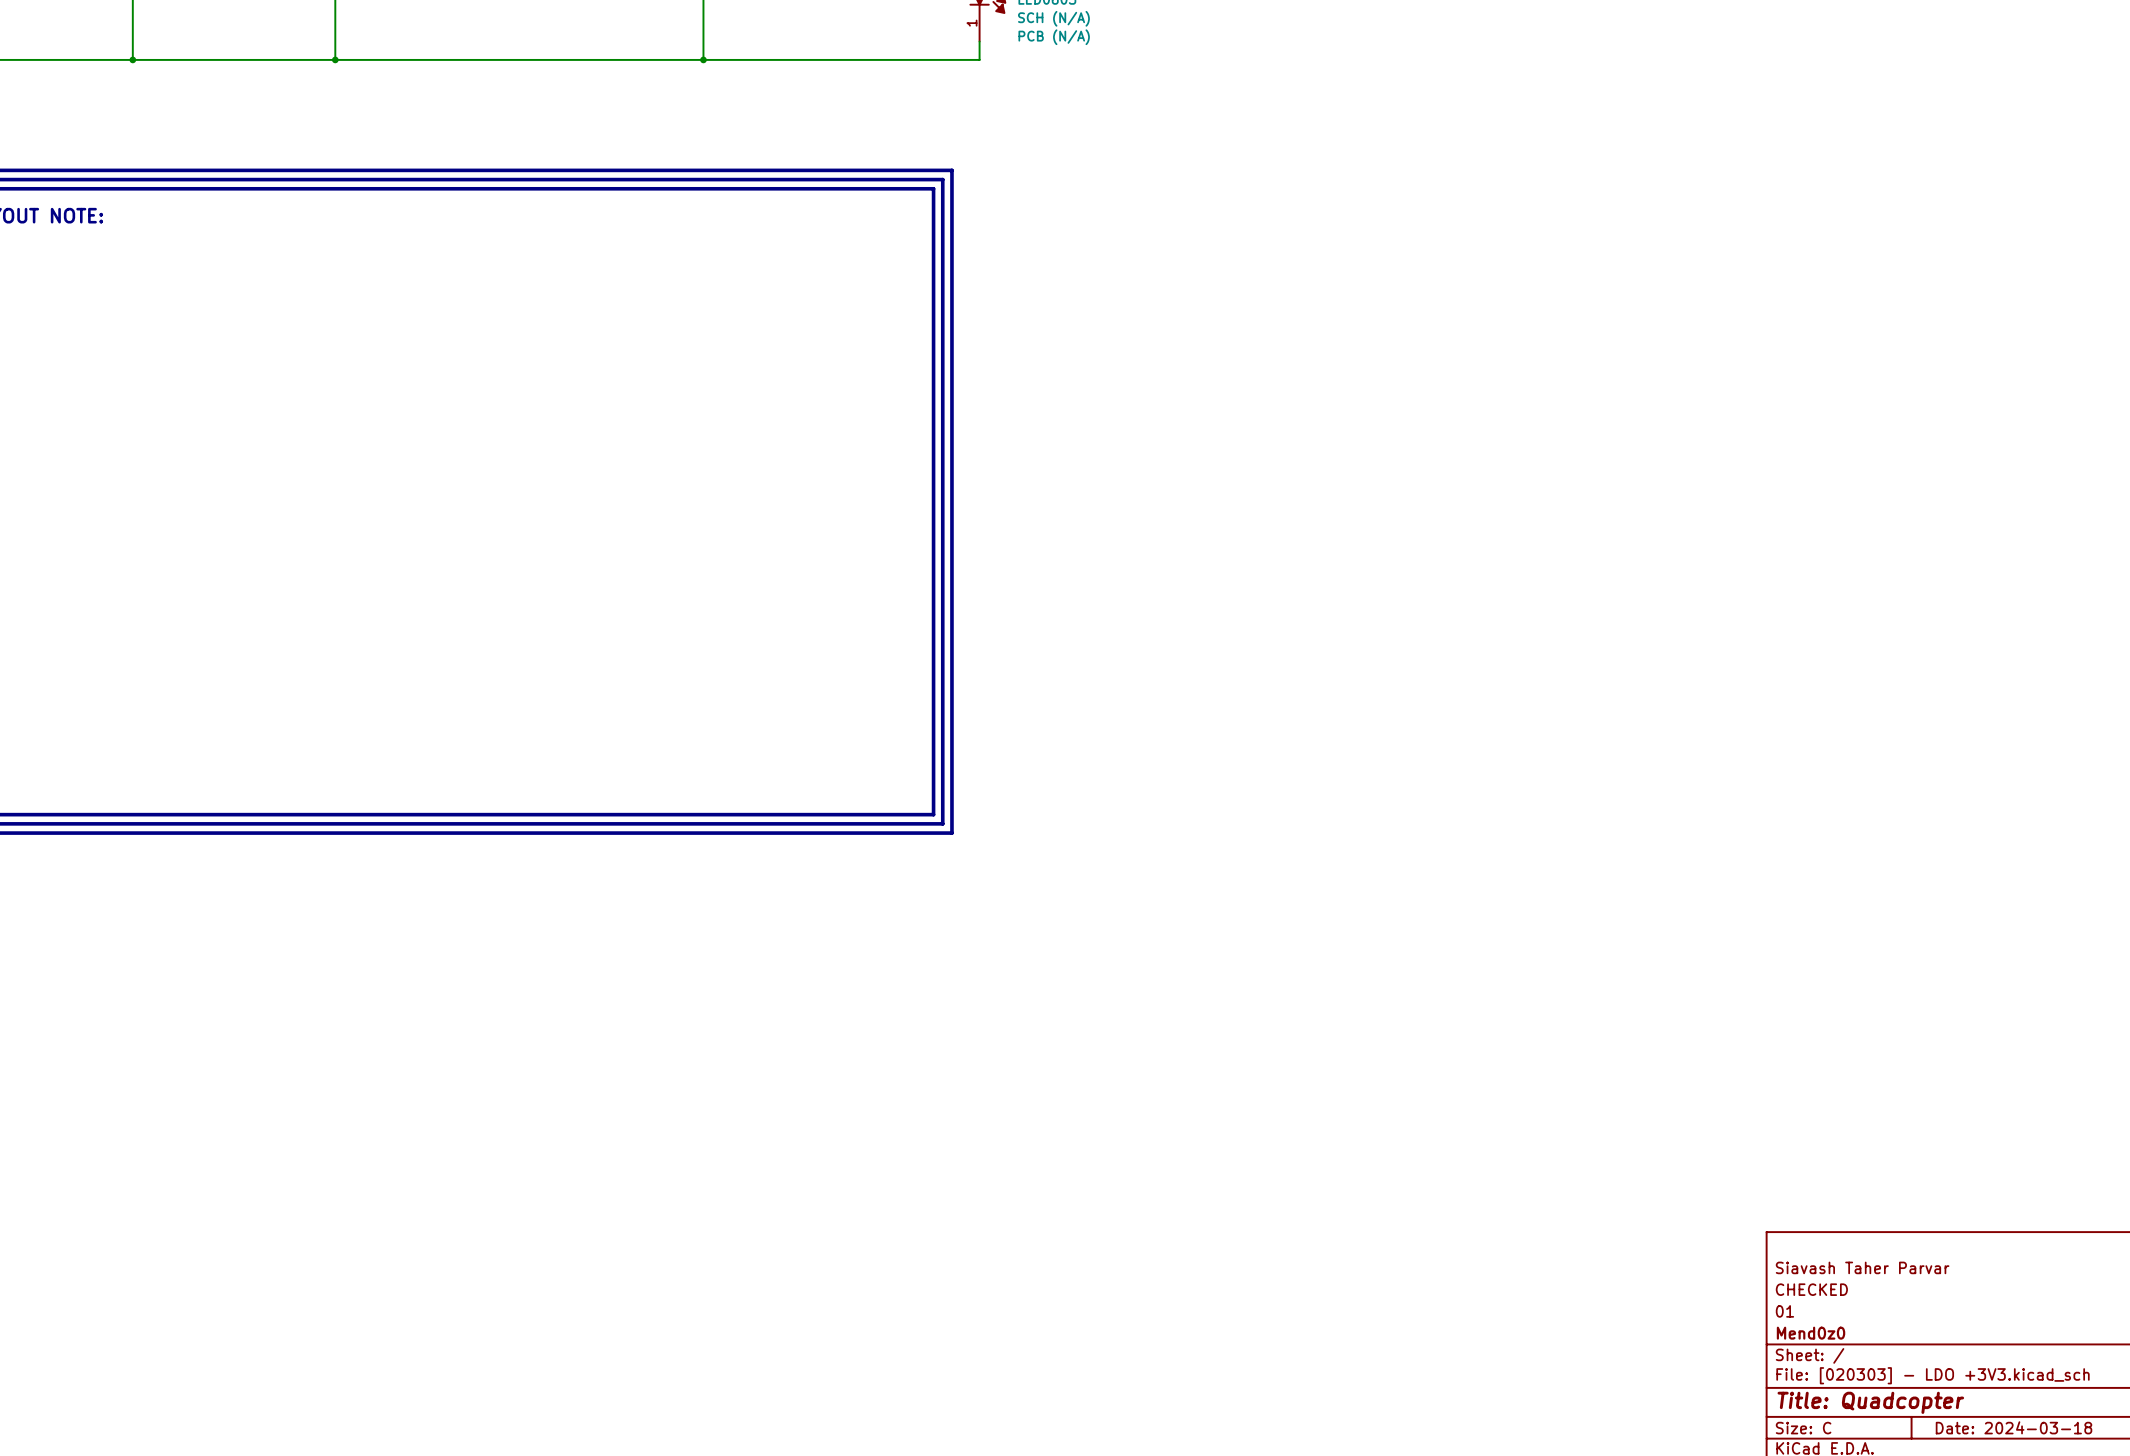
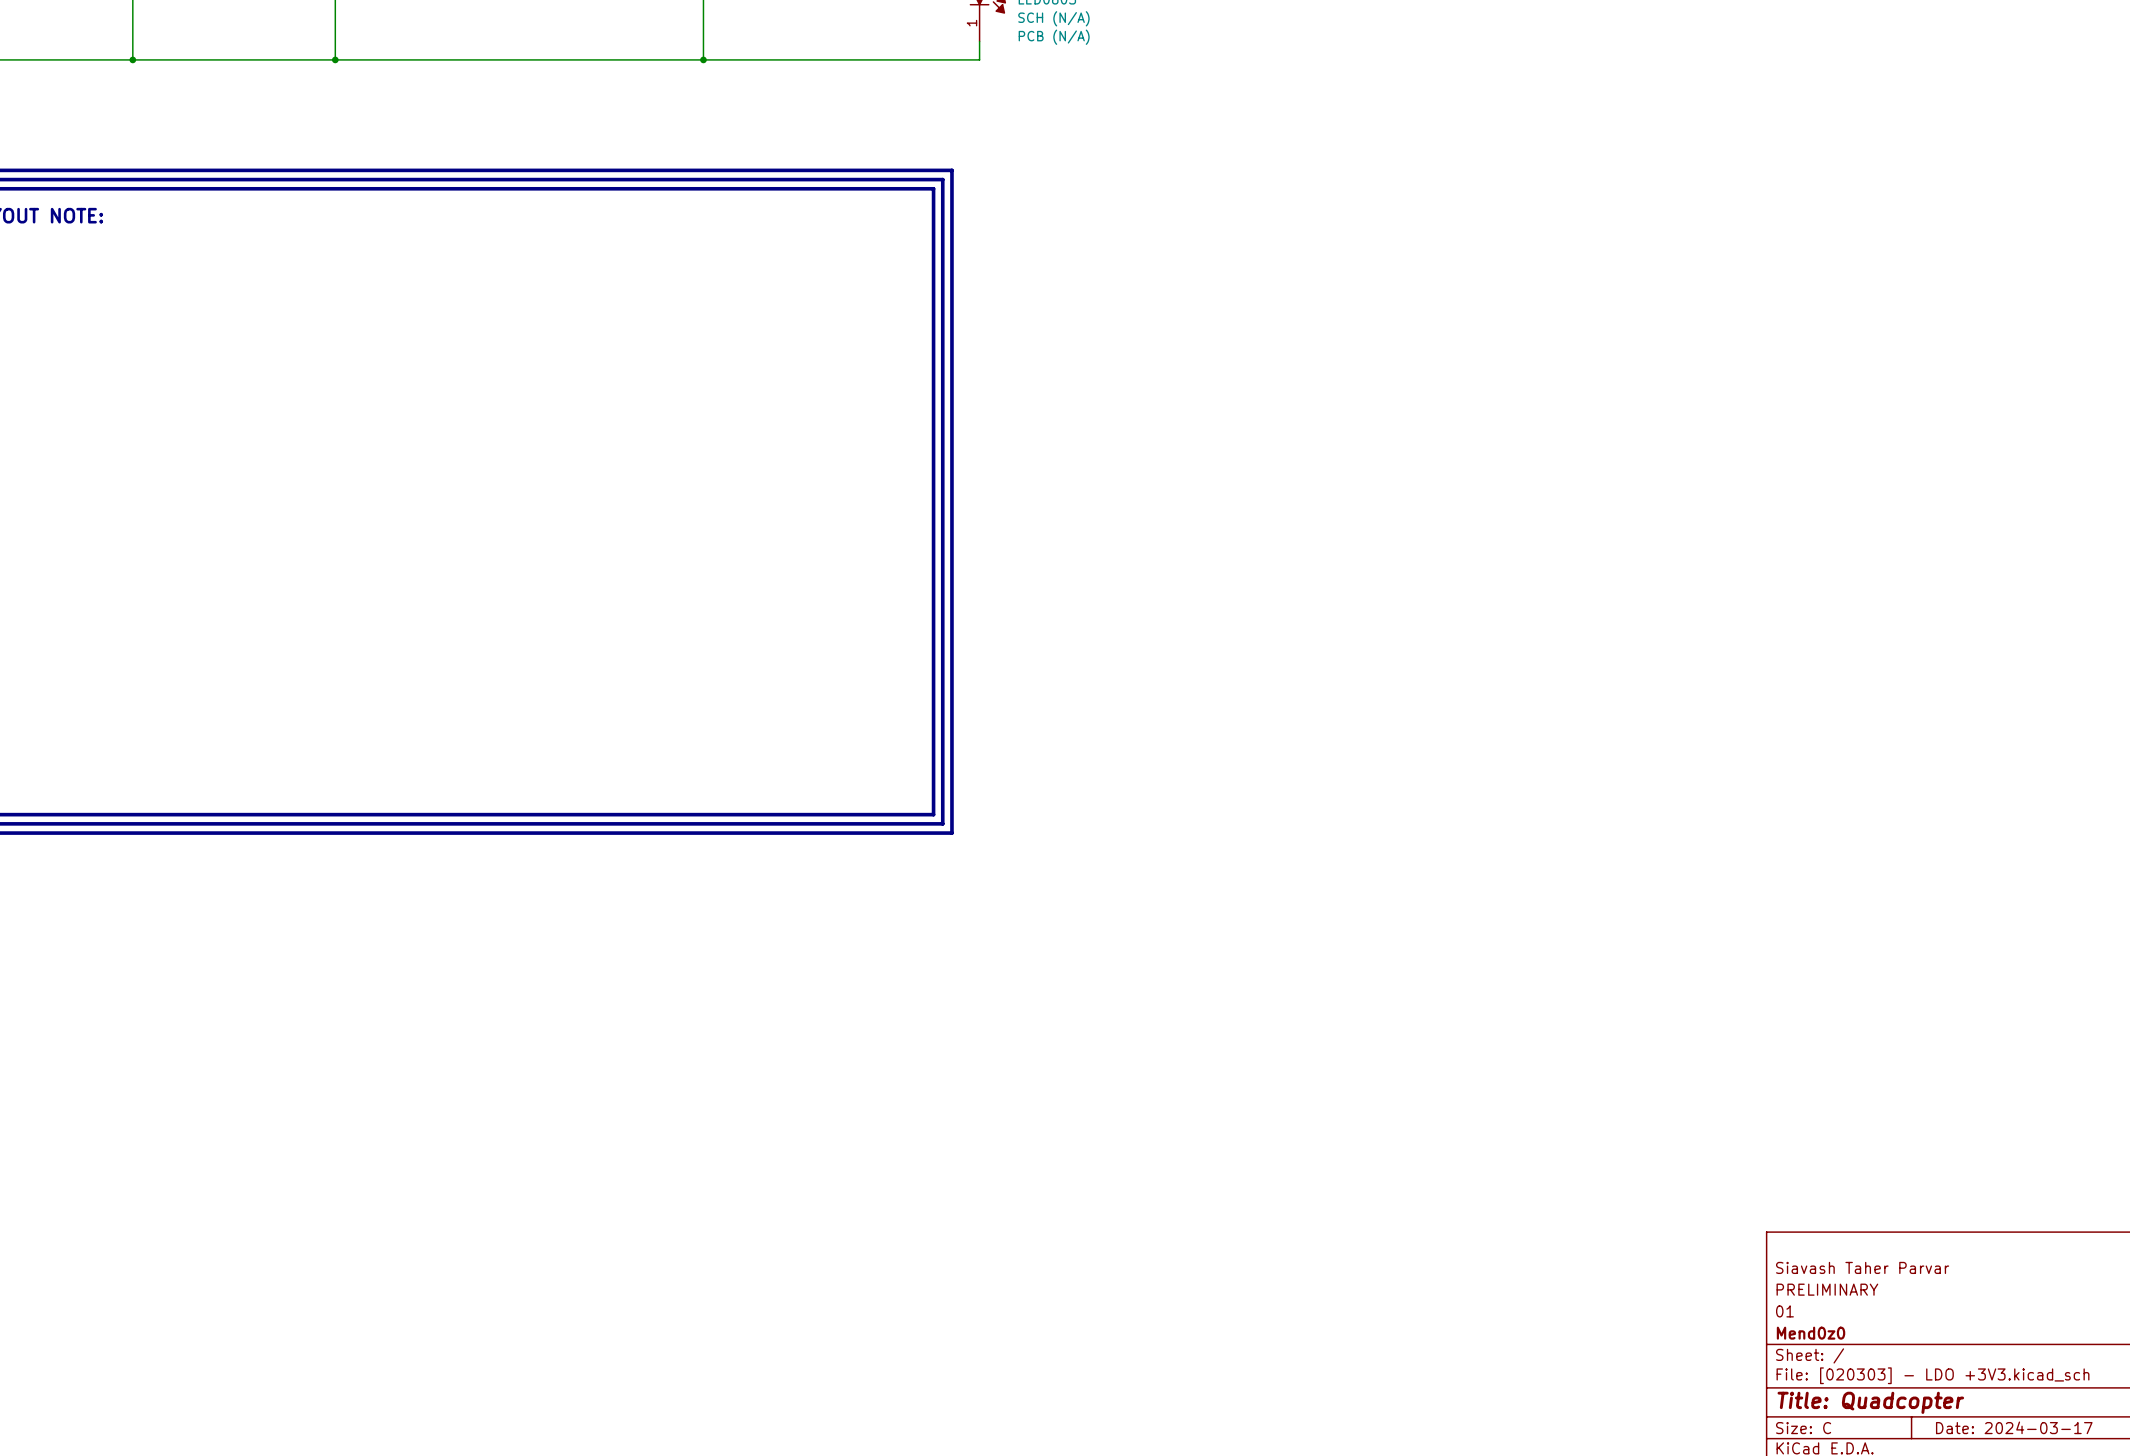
title block: CHECKED (1811, 1289) -> PRELIMINARY (1827, 1289)
title block: Date: 2024-03-18 (2014, 1427) -> Date: 2024-03-17 (2014, 1427)

